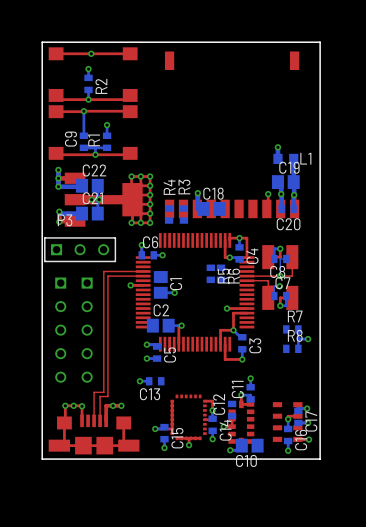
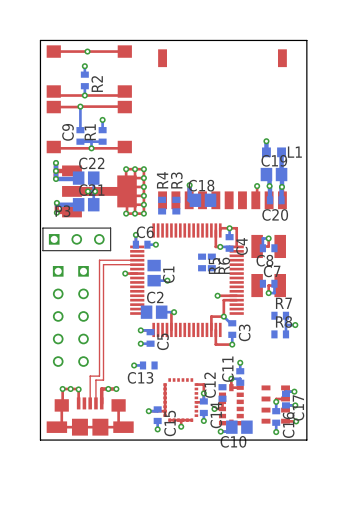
top track: (292, 257) (292, 276) (246, 276) -> none
bottom track: (286, 258) (280, 258) (280, 276) -> none
via: (280, 276) -> none
top track: (246, 280) (268, 280) (268, 297) -> none
bottom track: (279, 286) (274, 286) (274, 296) -> none
via: (279, 286) -> none

